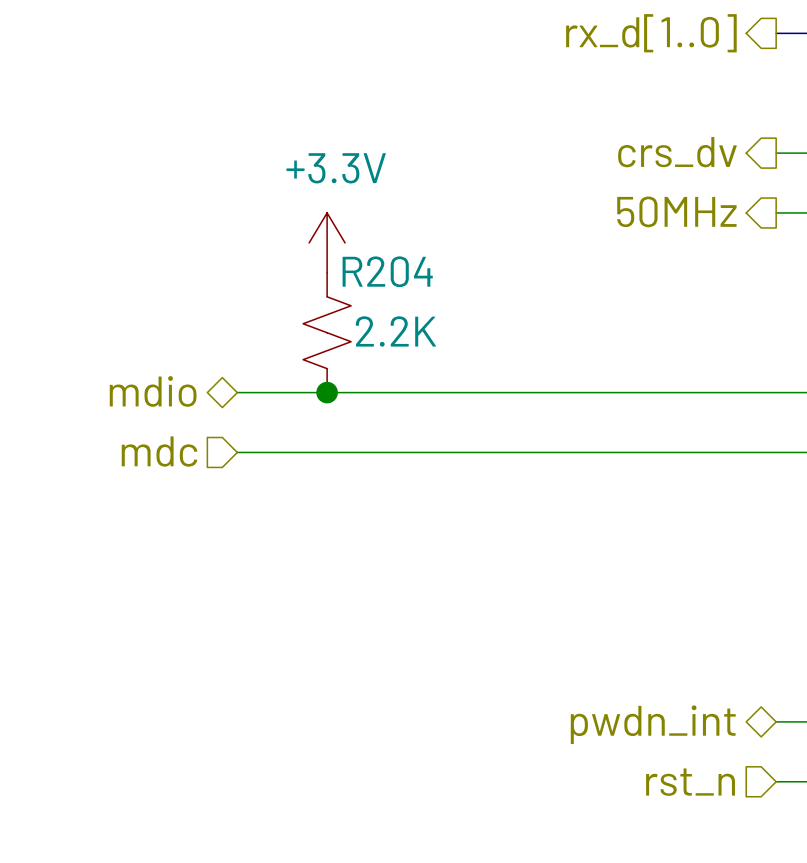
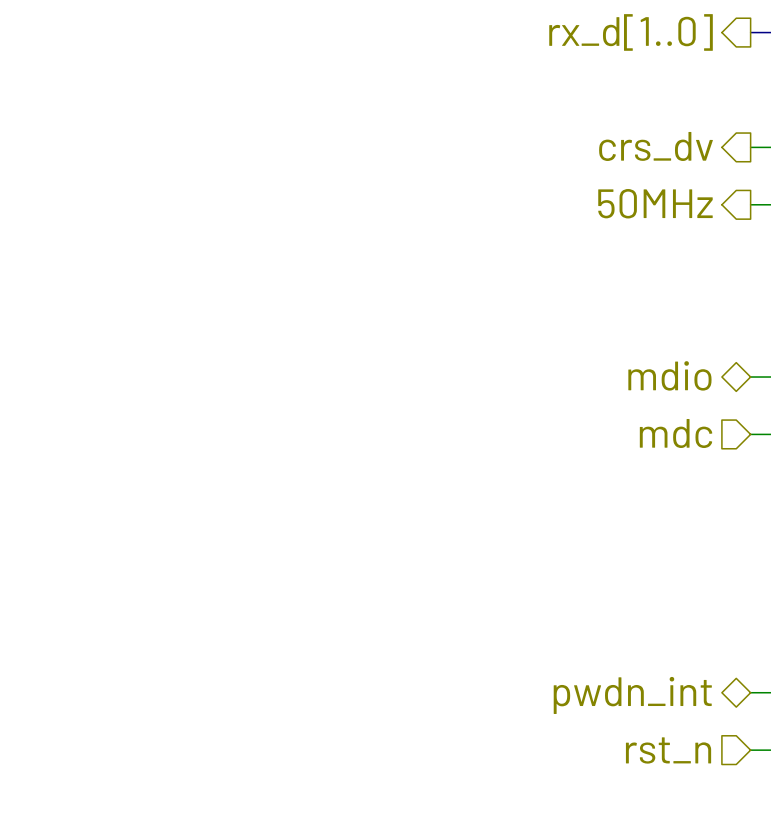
power symbol: +3.3V (327, 242) -> none
R204: 2.2K (327, 332) -> none
hierarchical label position: mdio (153, 391) -> mdio (669, 375)
wire: (237, 392) (776, 392) -> none
junction: (327, 392) -> none
hierarchical label position: mdc (159, 451) -> mdc (676, 433)
wire: (237, 452) (776, 452) -> none

